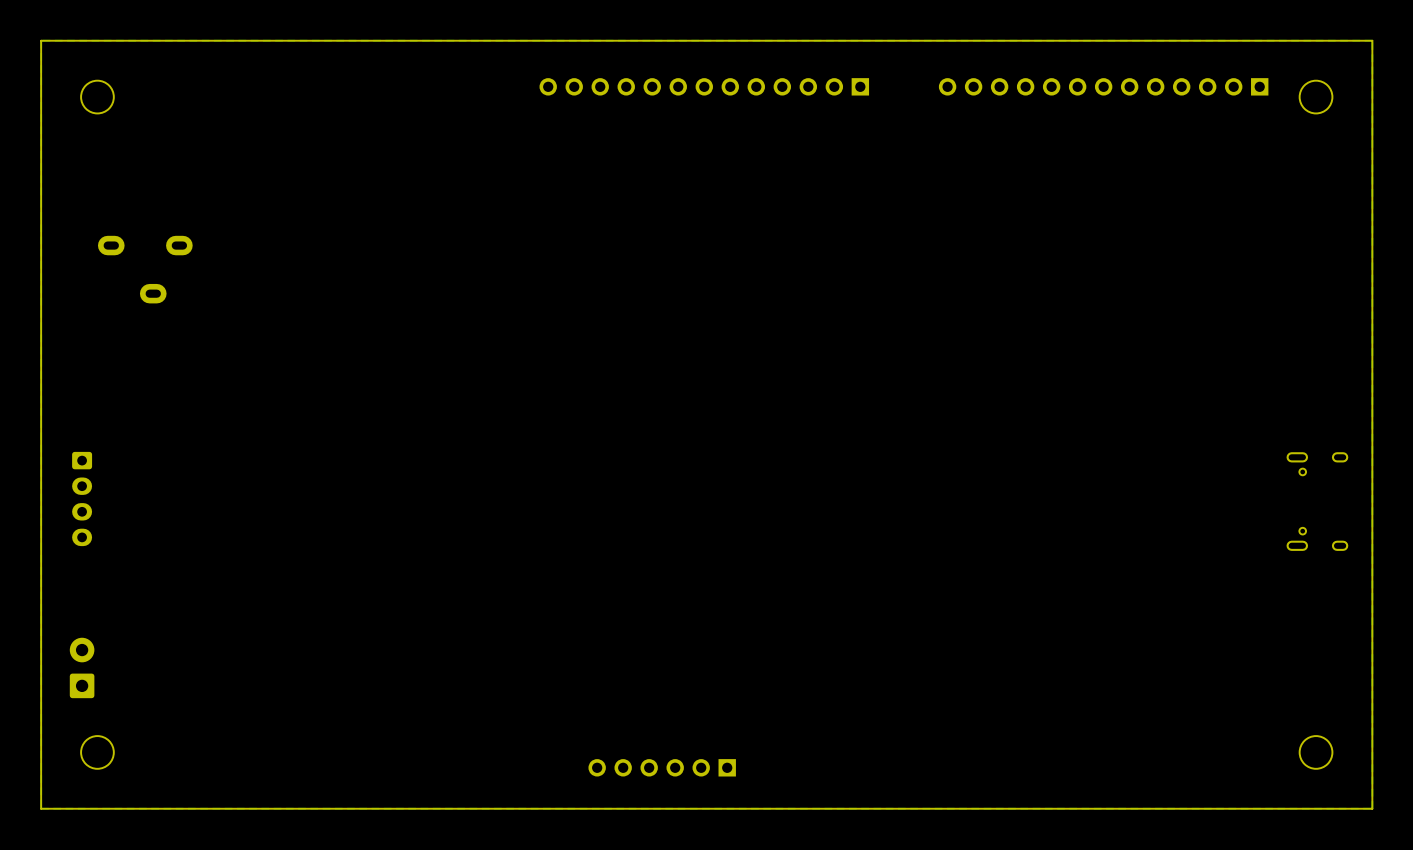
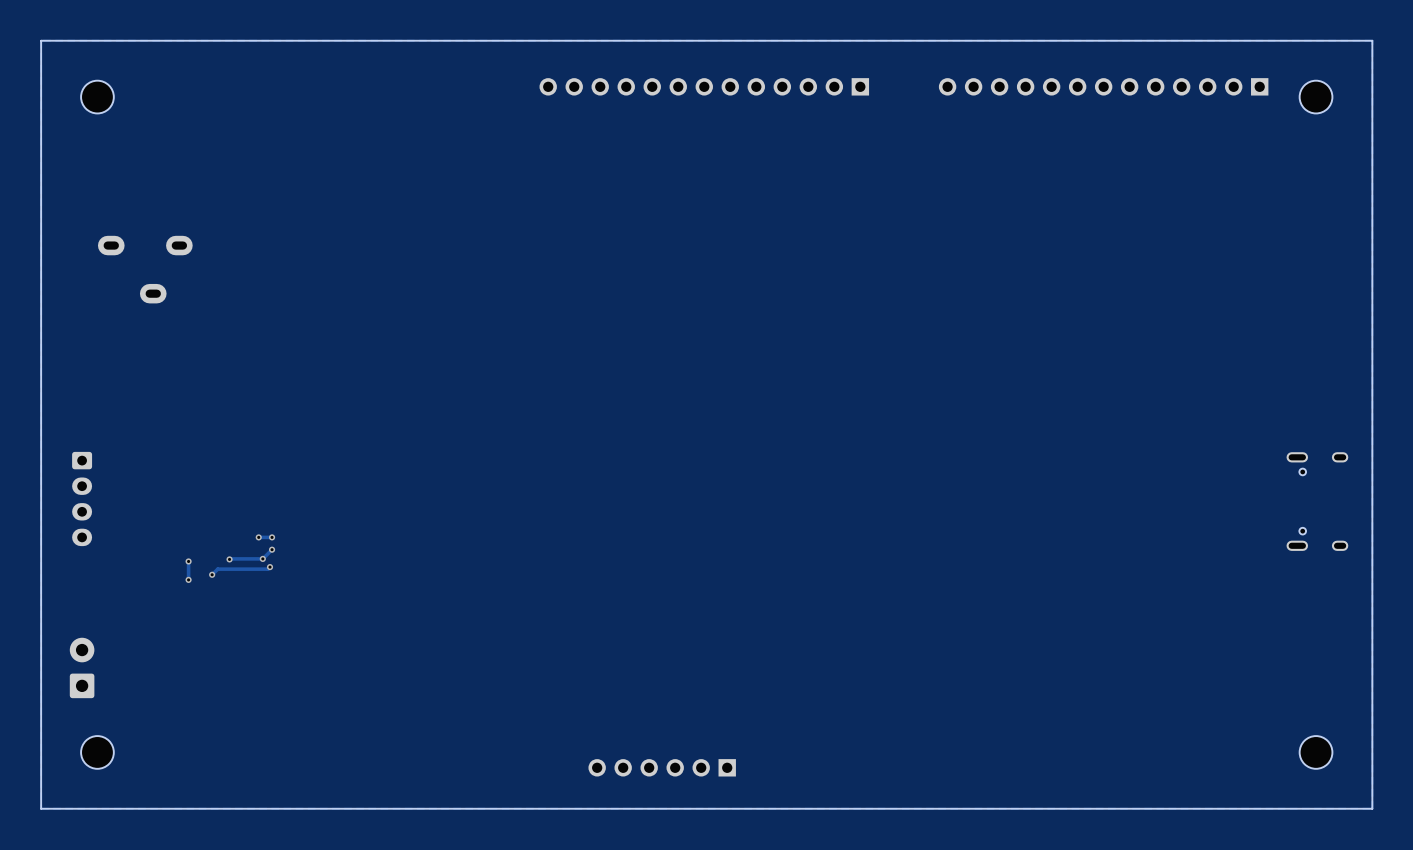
via: none -> (258, 537)
track: none -> (272, 537) (258, 537)
via: none -> (272, 537)
track: none -> (272, 549) (262, 558) (229, 559)
via: none -> (272, 549)
via: none -> (262, 558)
via: none -> (229, 559)
track: none -> (188, 561) (188, 579)
via: none -> (188, 561)
track: none -> (270, 567) (267, 569) (217, 569) (212, 574)
via: none -> (270, 567)
via: none -> (212, 574)
via: none -> (188, 579)

